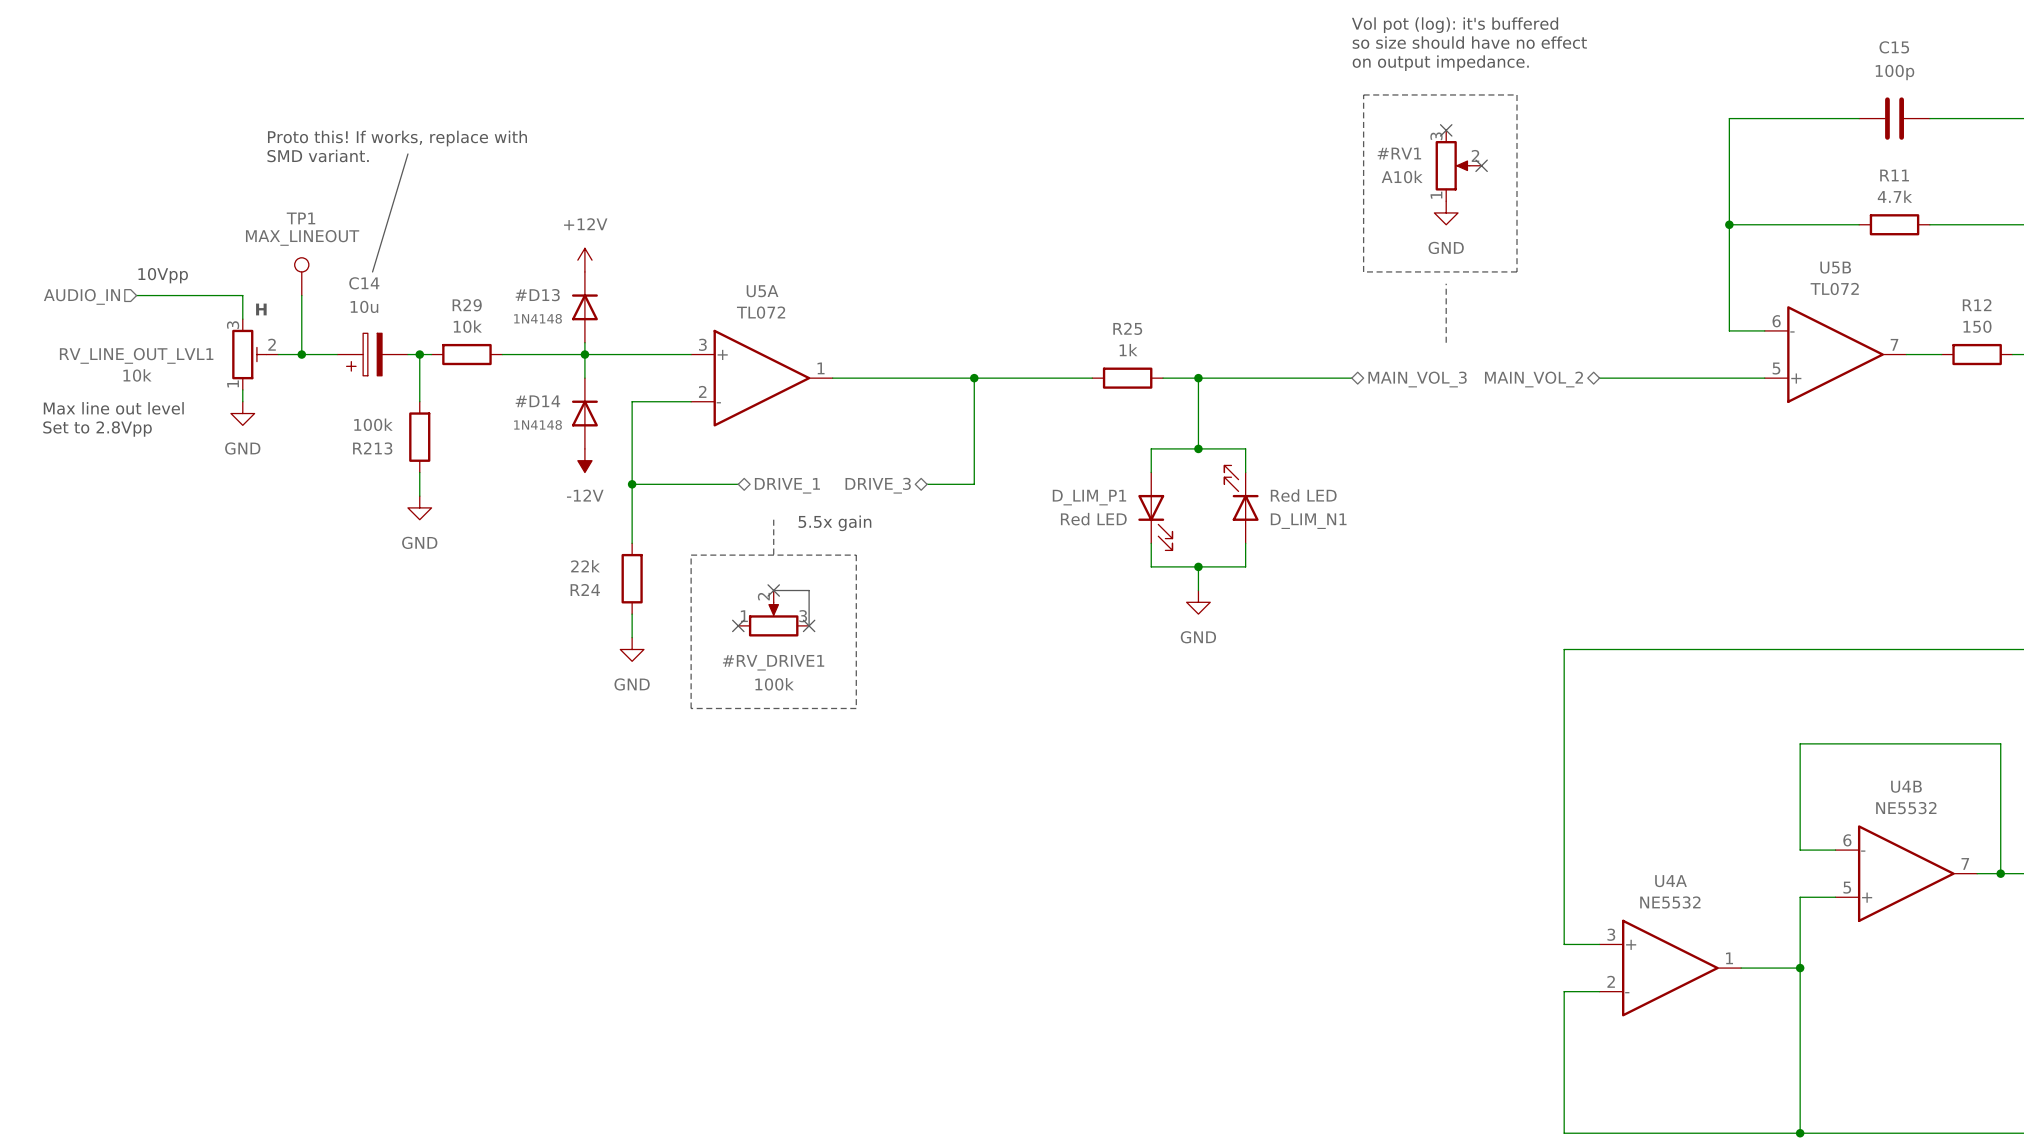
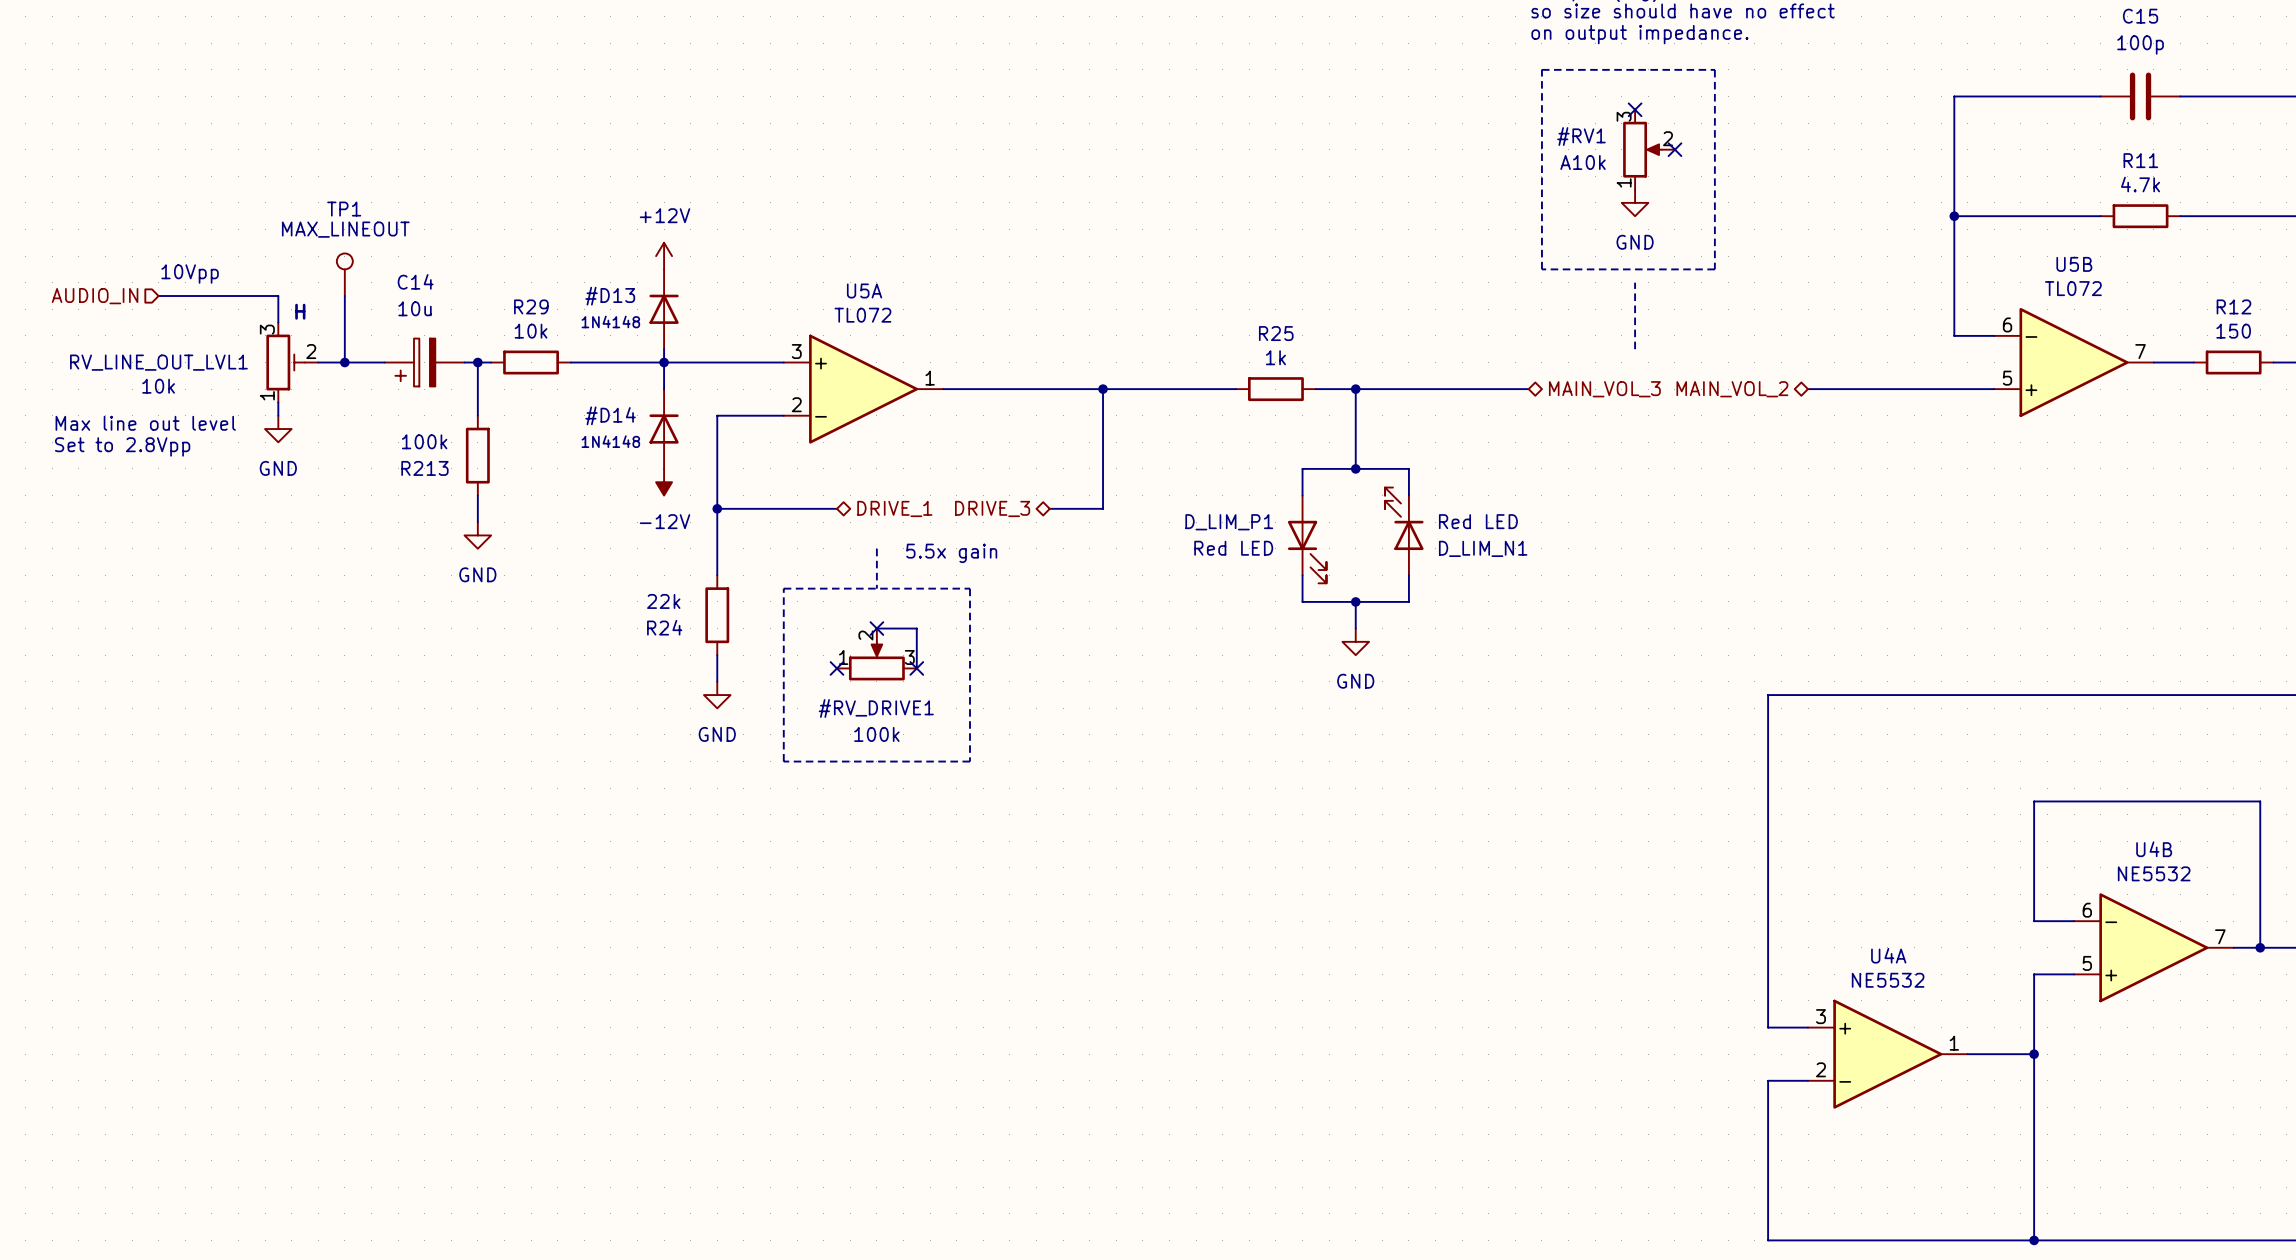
text: Proto this! If works, replace with (397, 138) -> none
line: (407, 153) (372, 271) -> none
text: SMD variant. (318, 155) -> none

